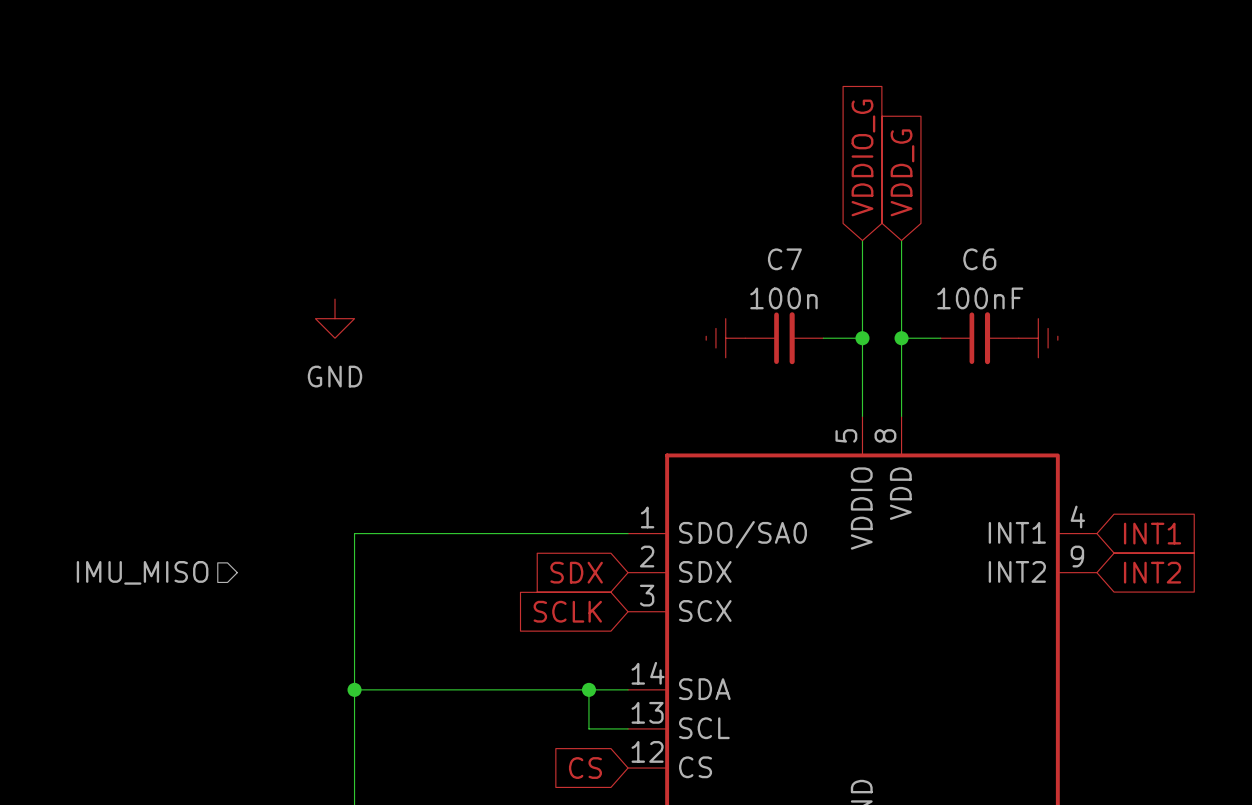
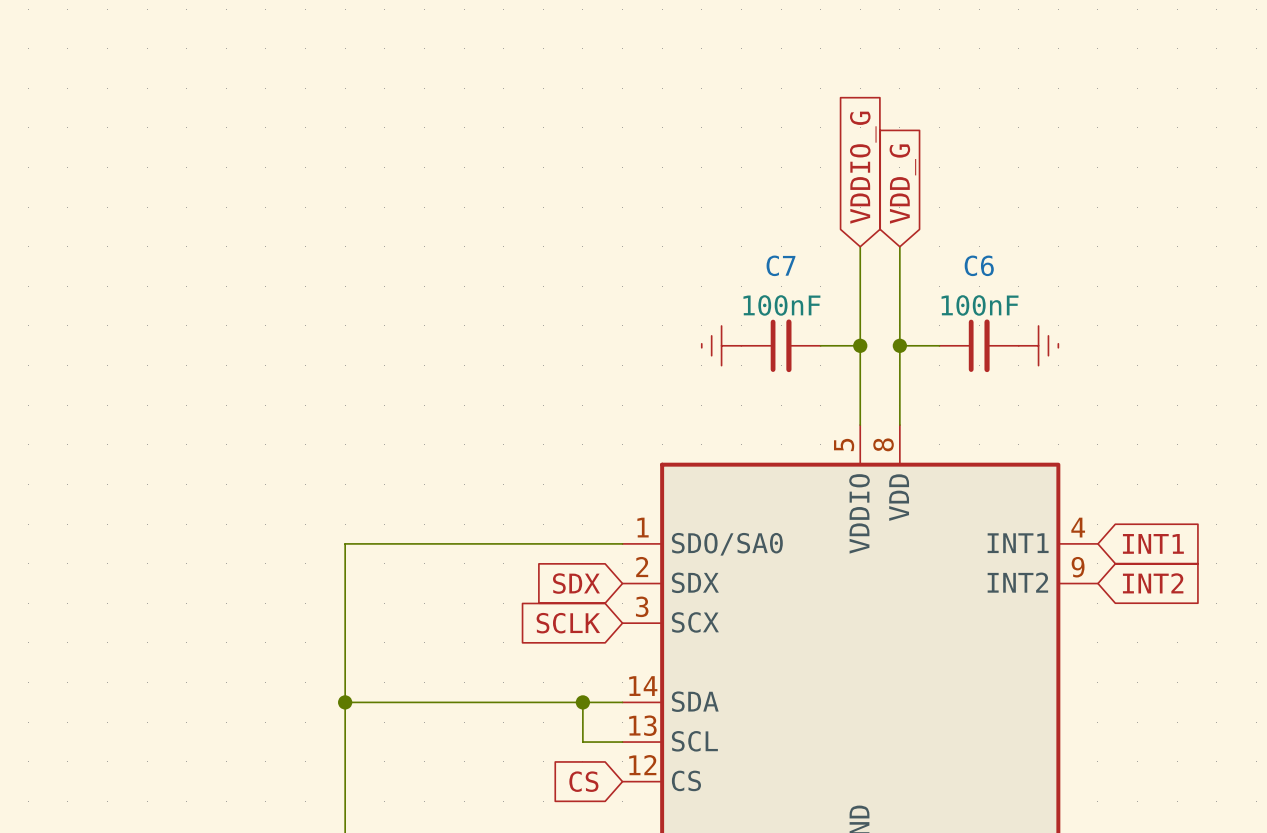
C7 value: 100n (783, 298) -> 100nF (781, 305)
power symbol: GND (335, 318) -> none
hierarchical label: IMU_MISO (142, 572) -> none

